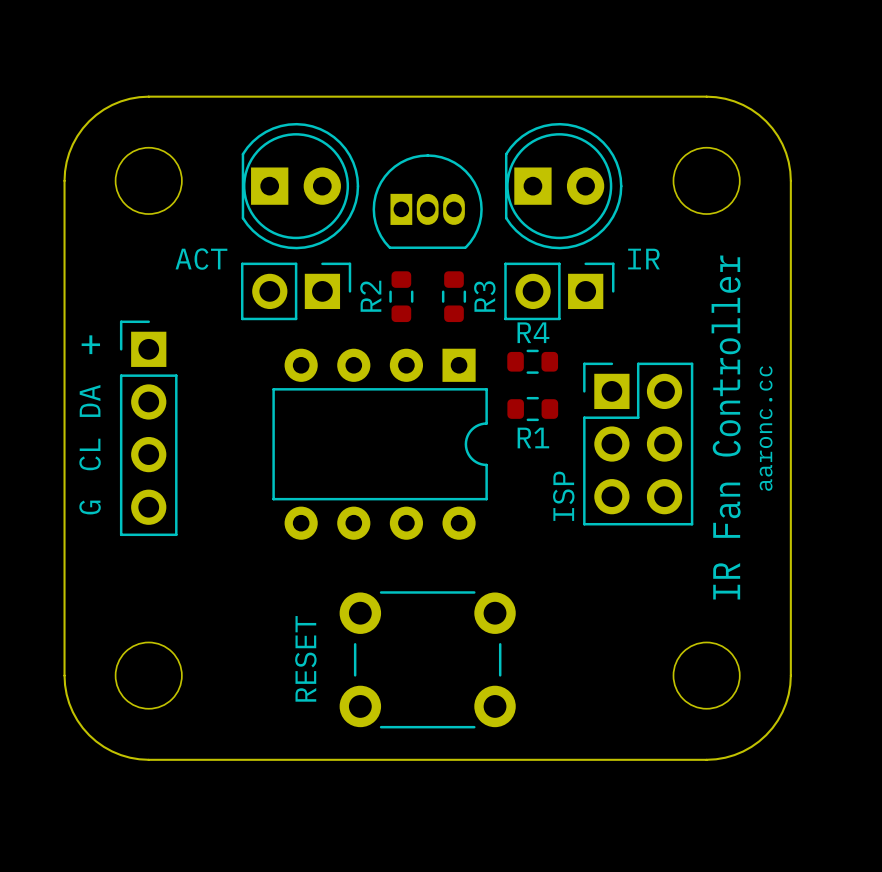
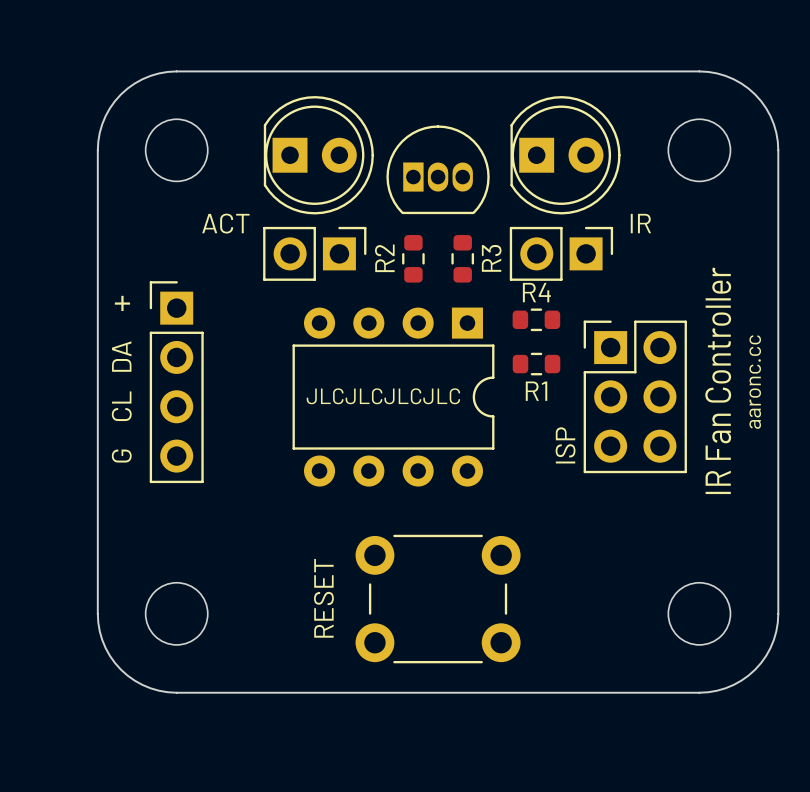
text: none -> JLCJLCJLCJLC (383, 396)

